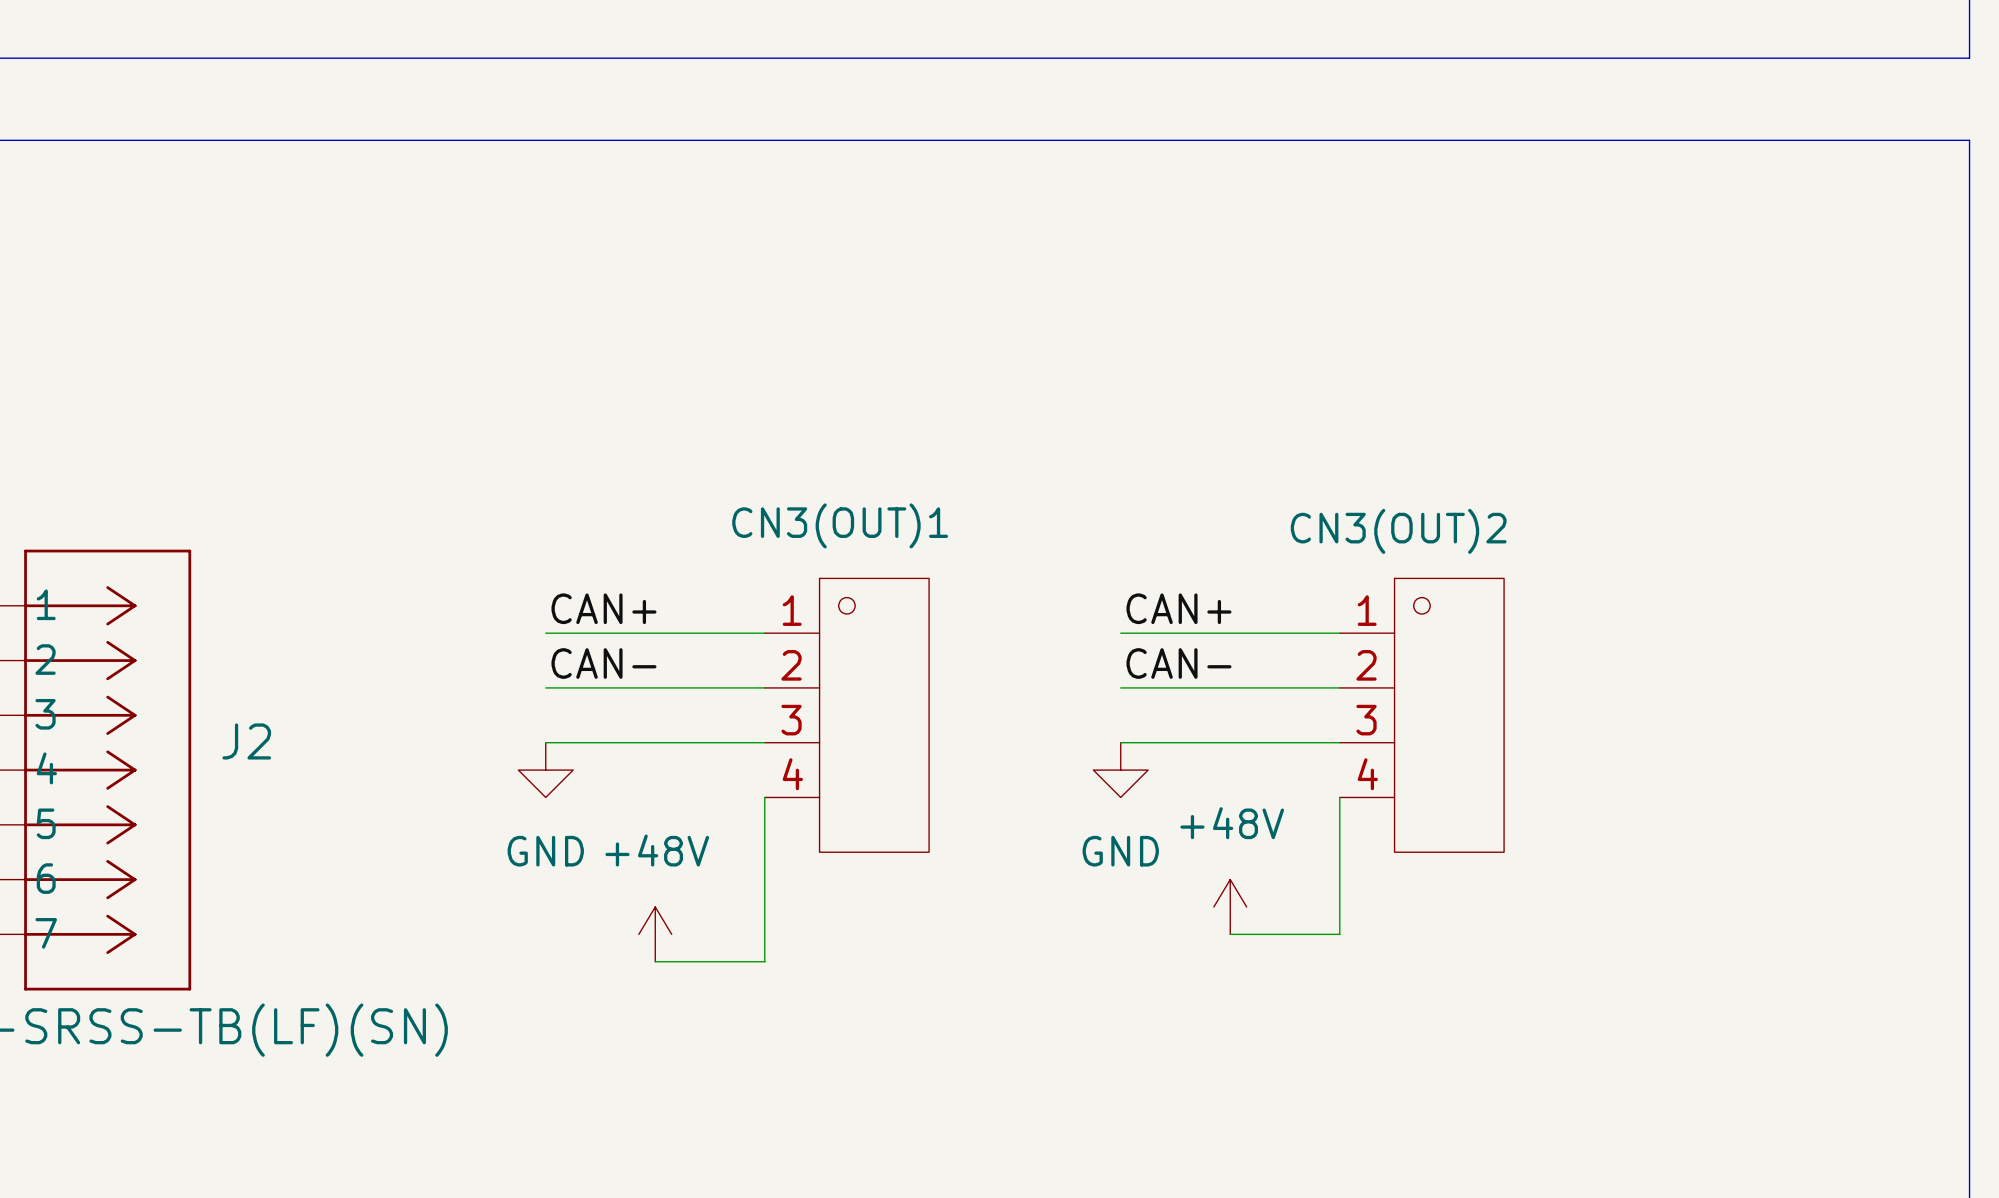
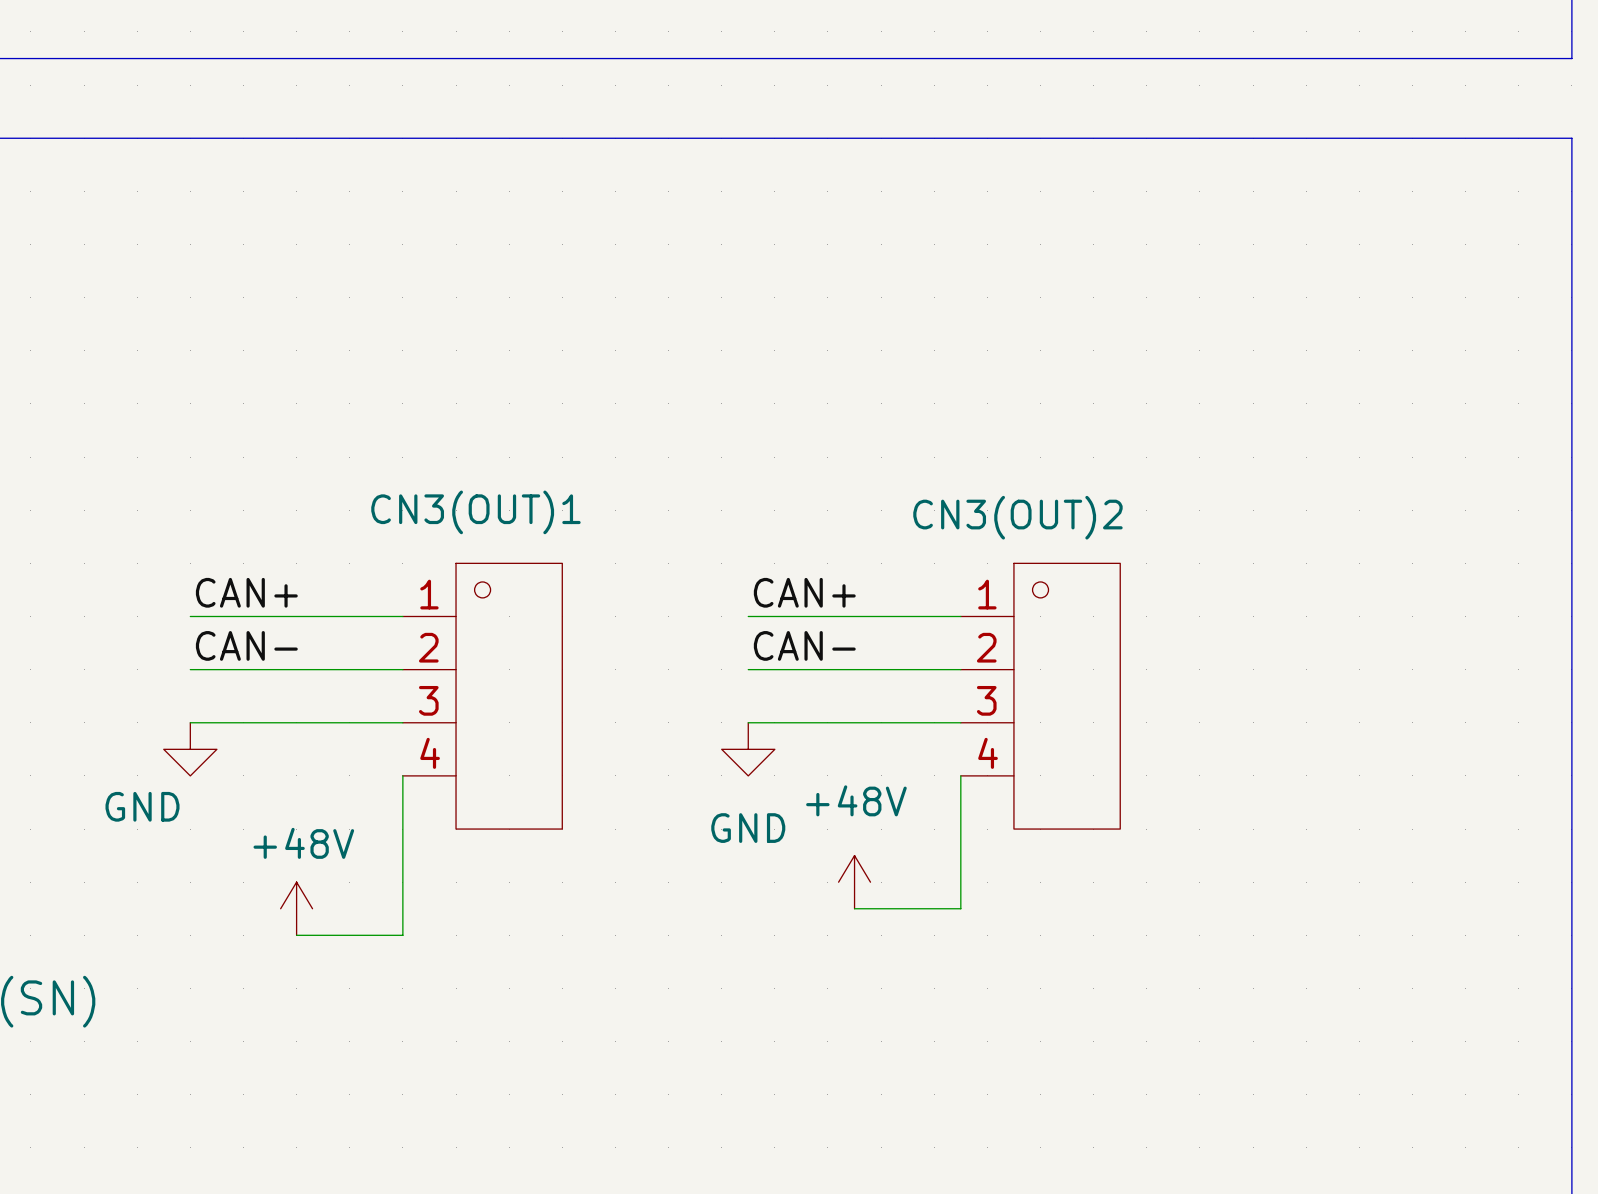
power symbol text position: +48V (657, 850) -> +48V (303, 843)
power symbol text position: GND (545, 851) -> GND (142, 806)

